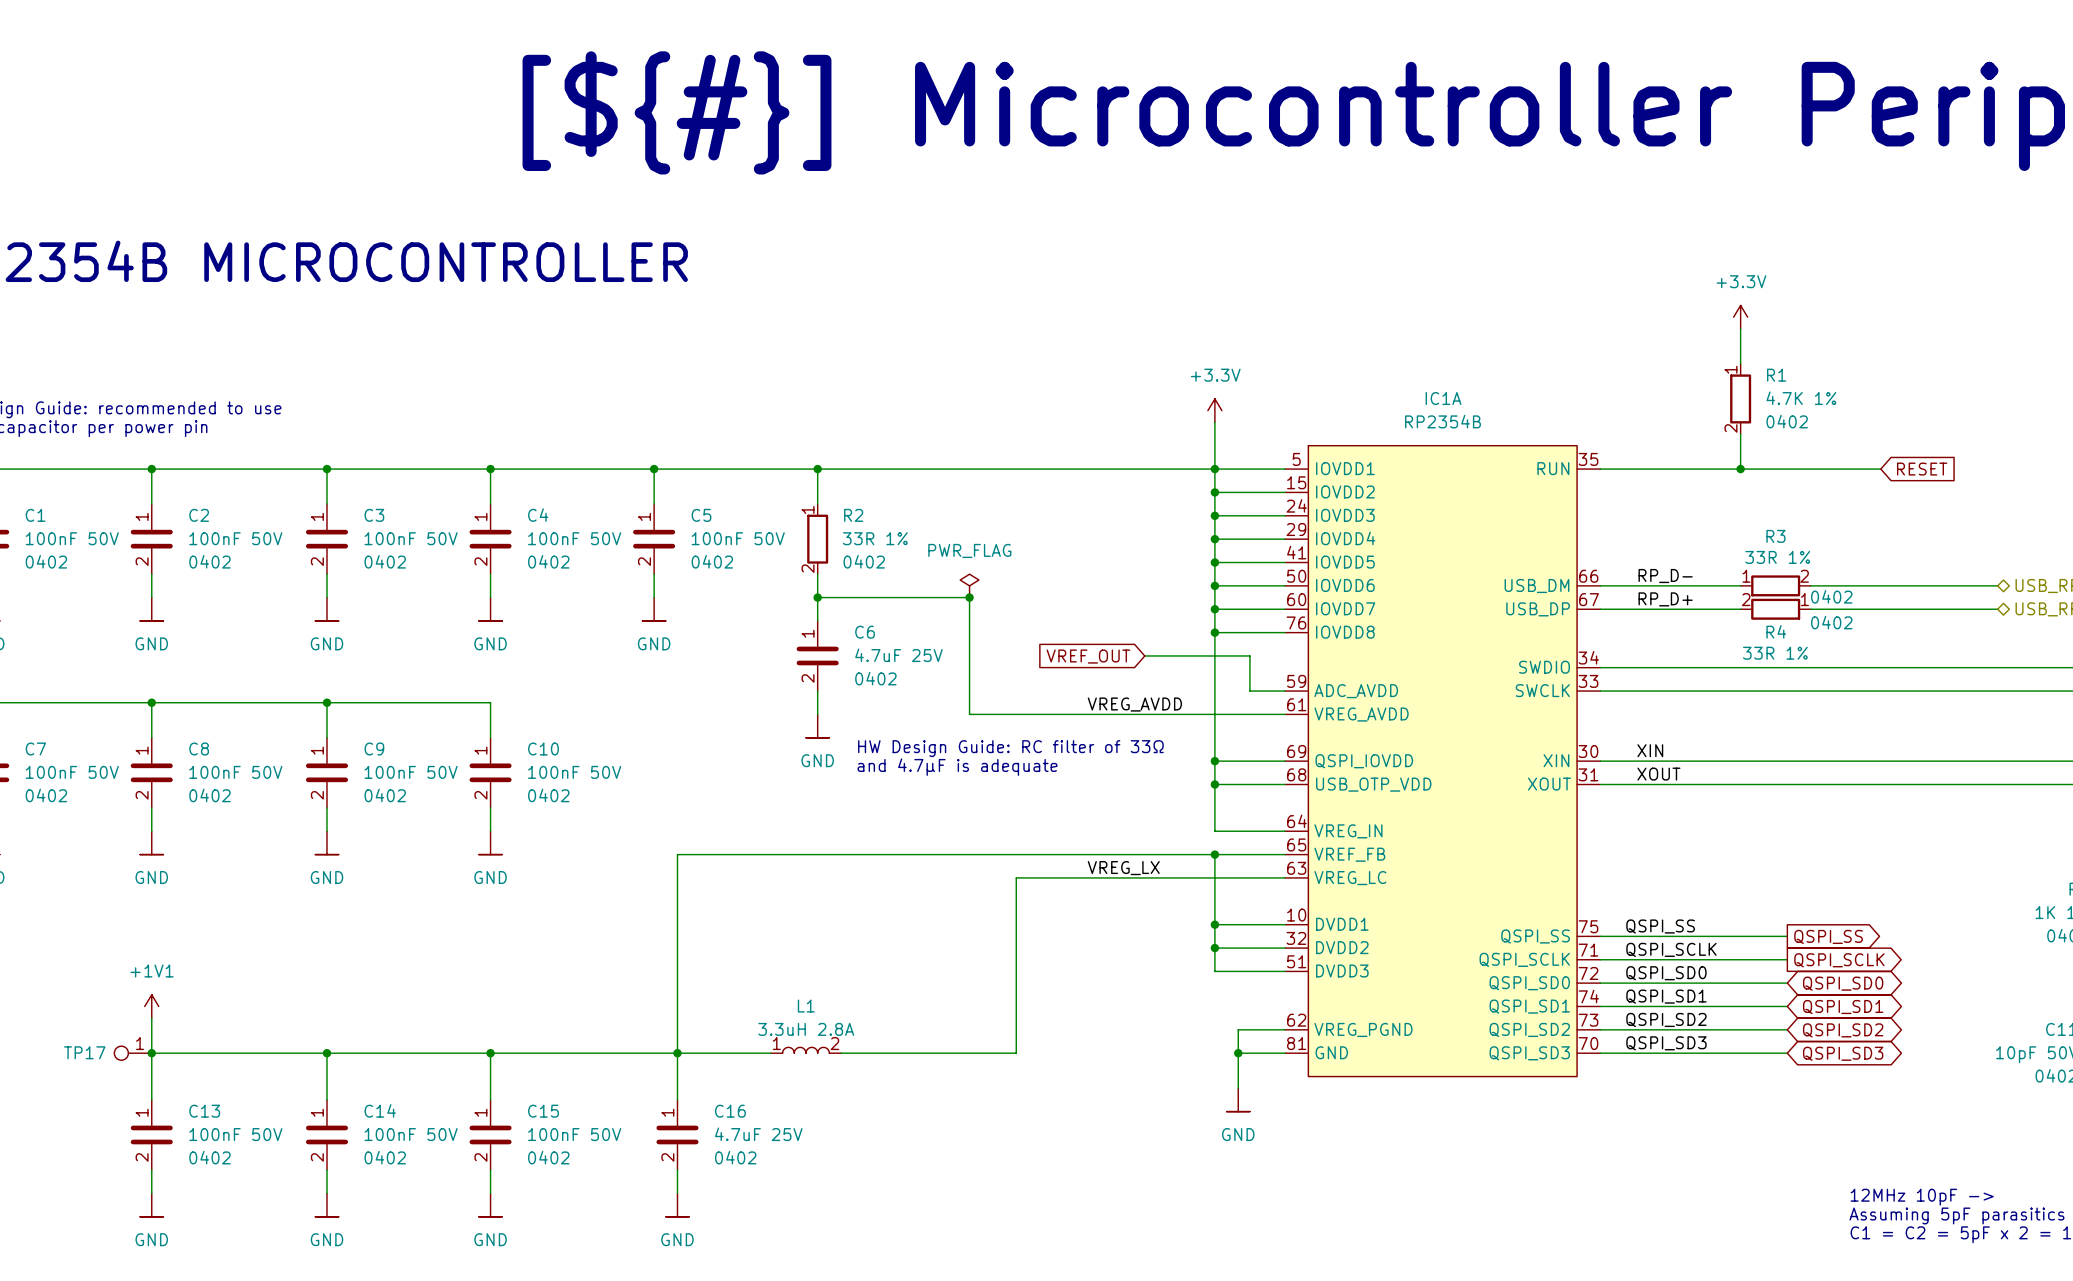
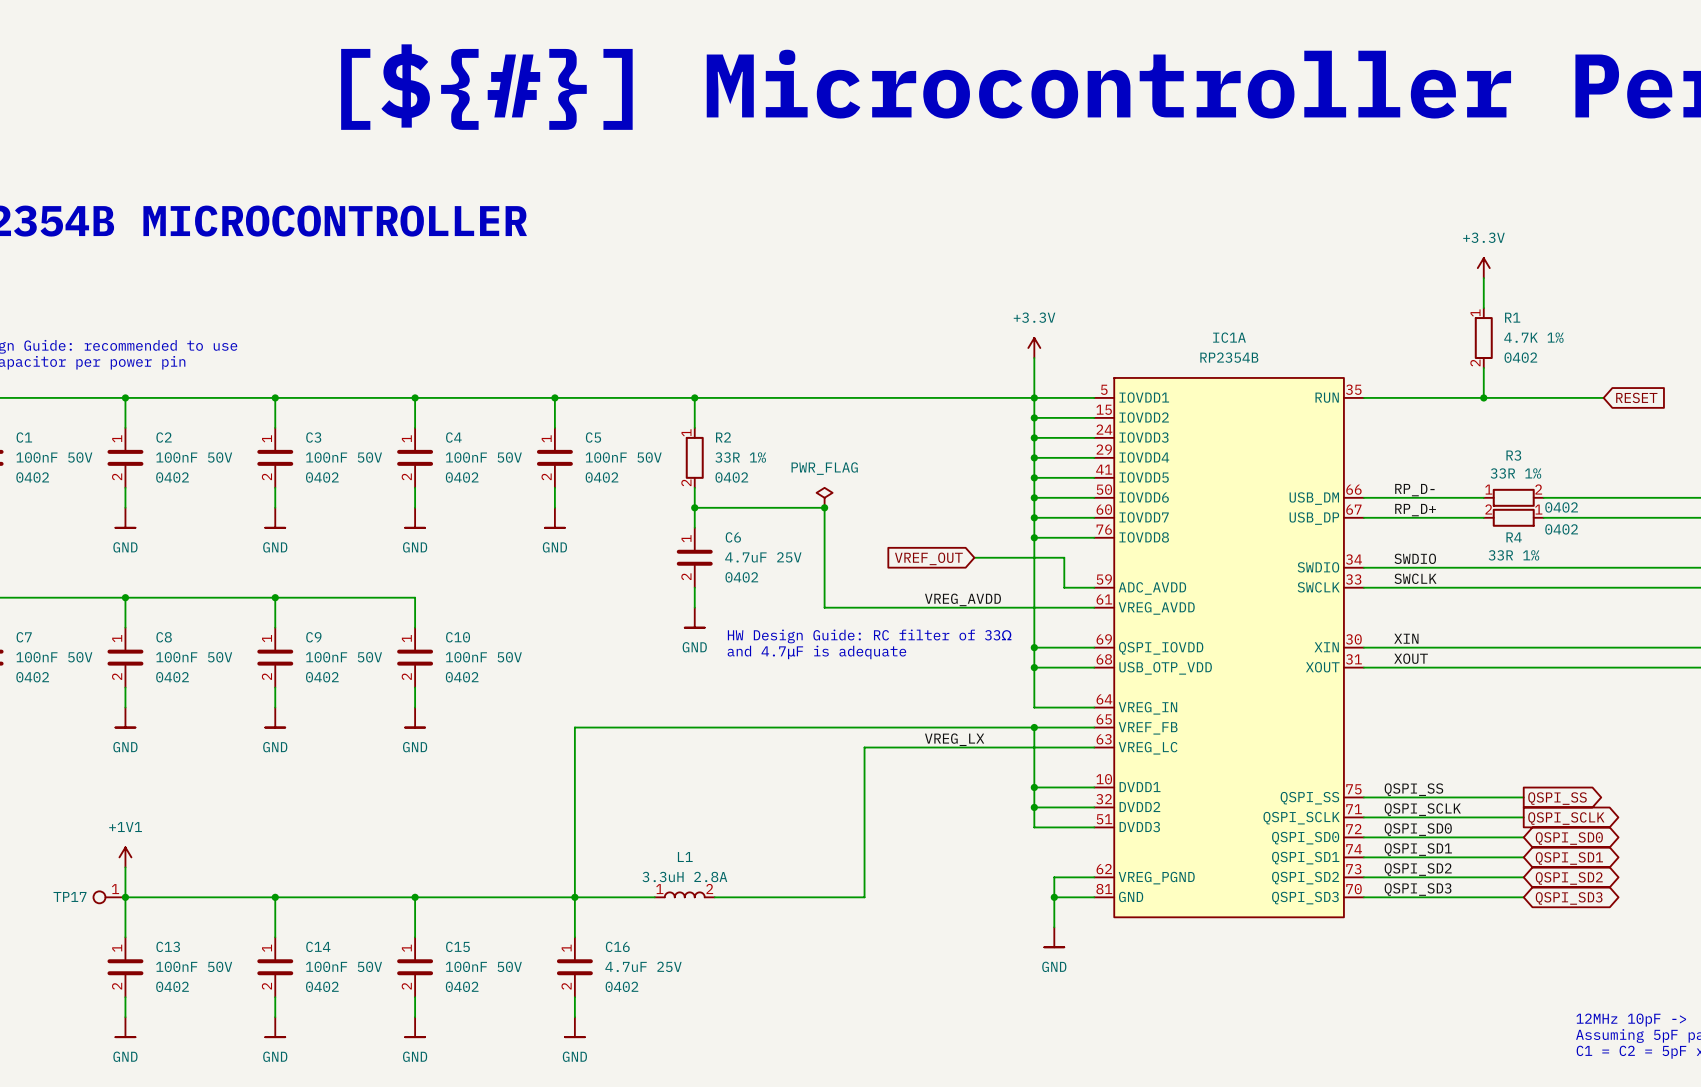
label: none -> SWDIO (1415, 558)
label: none -> SWCLK (1415, 578)

